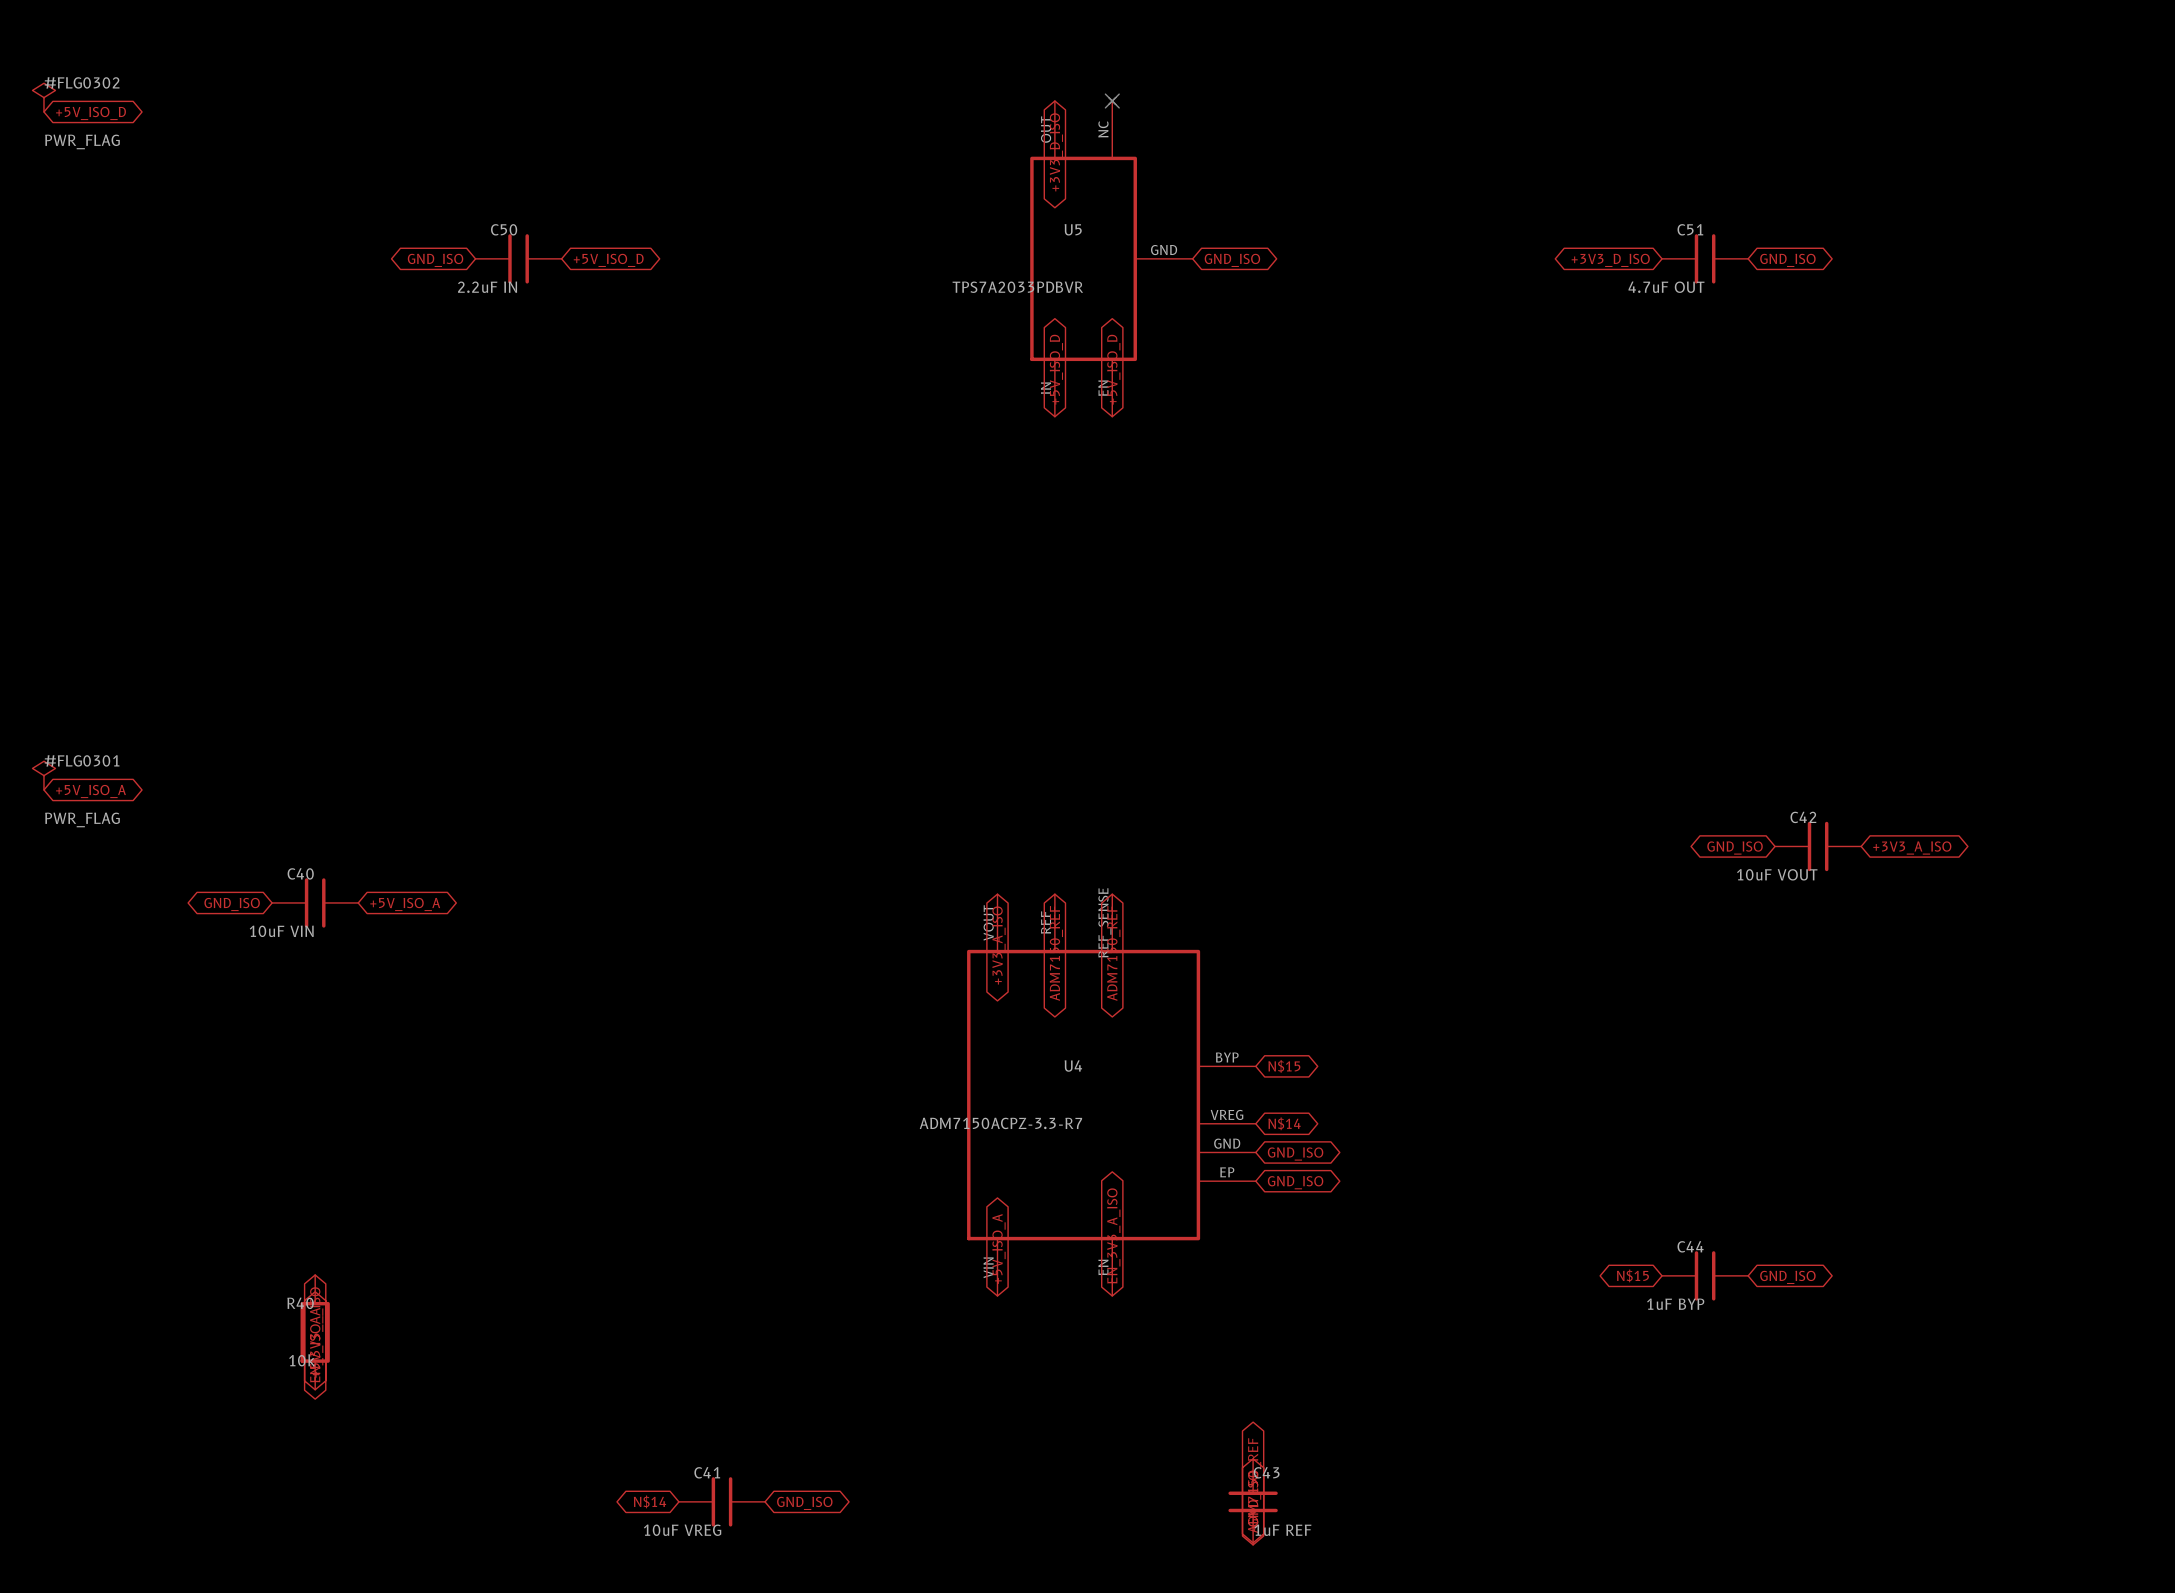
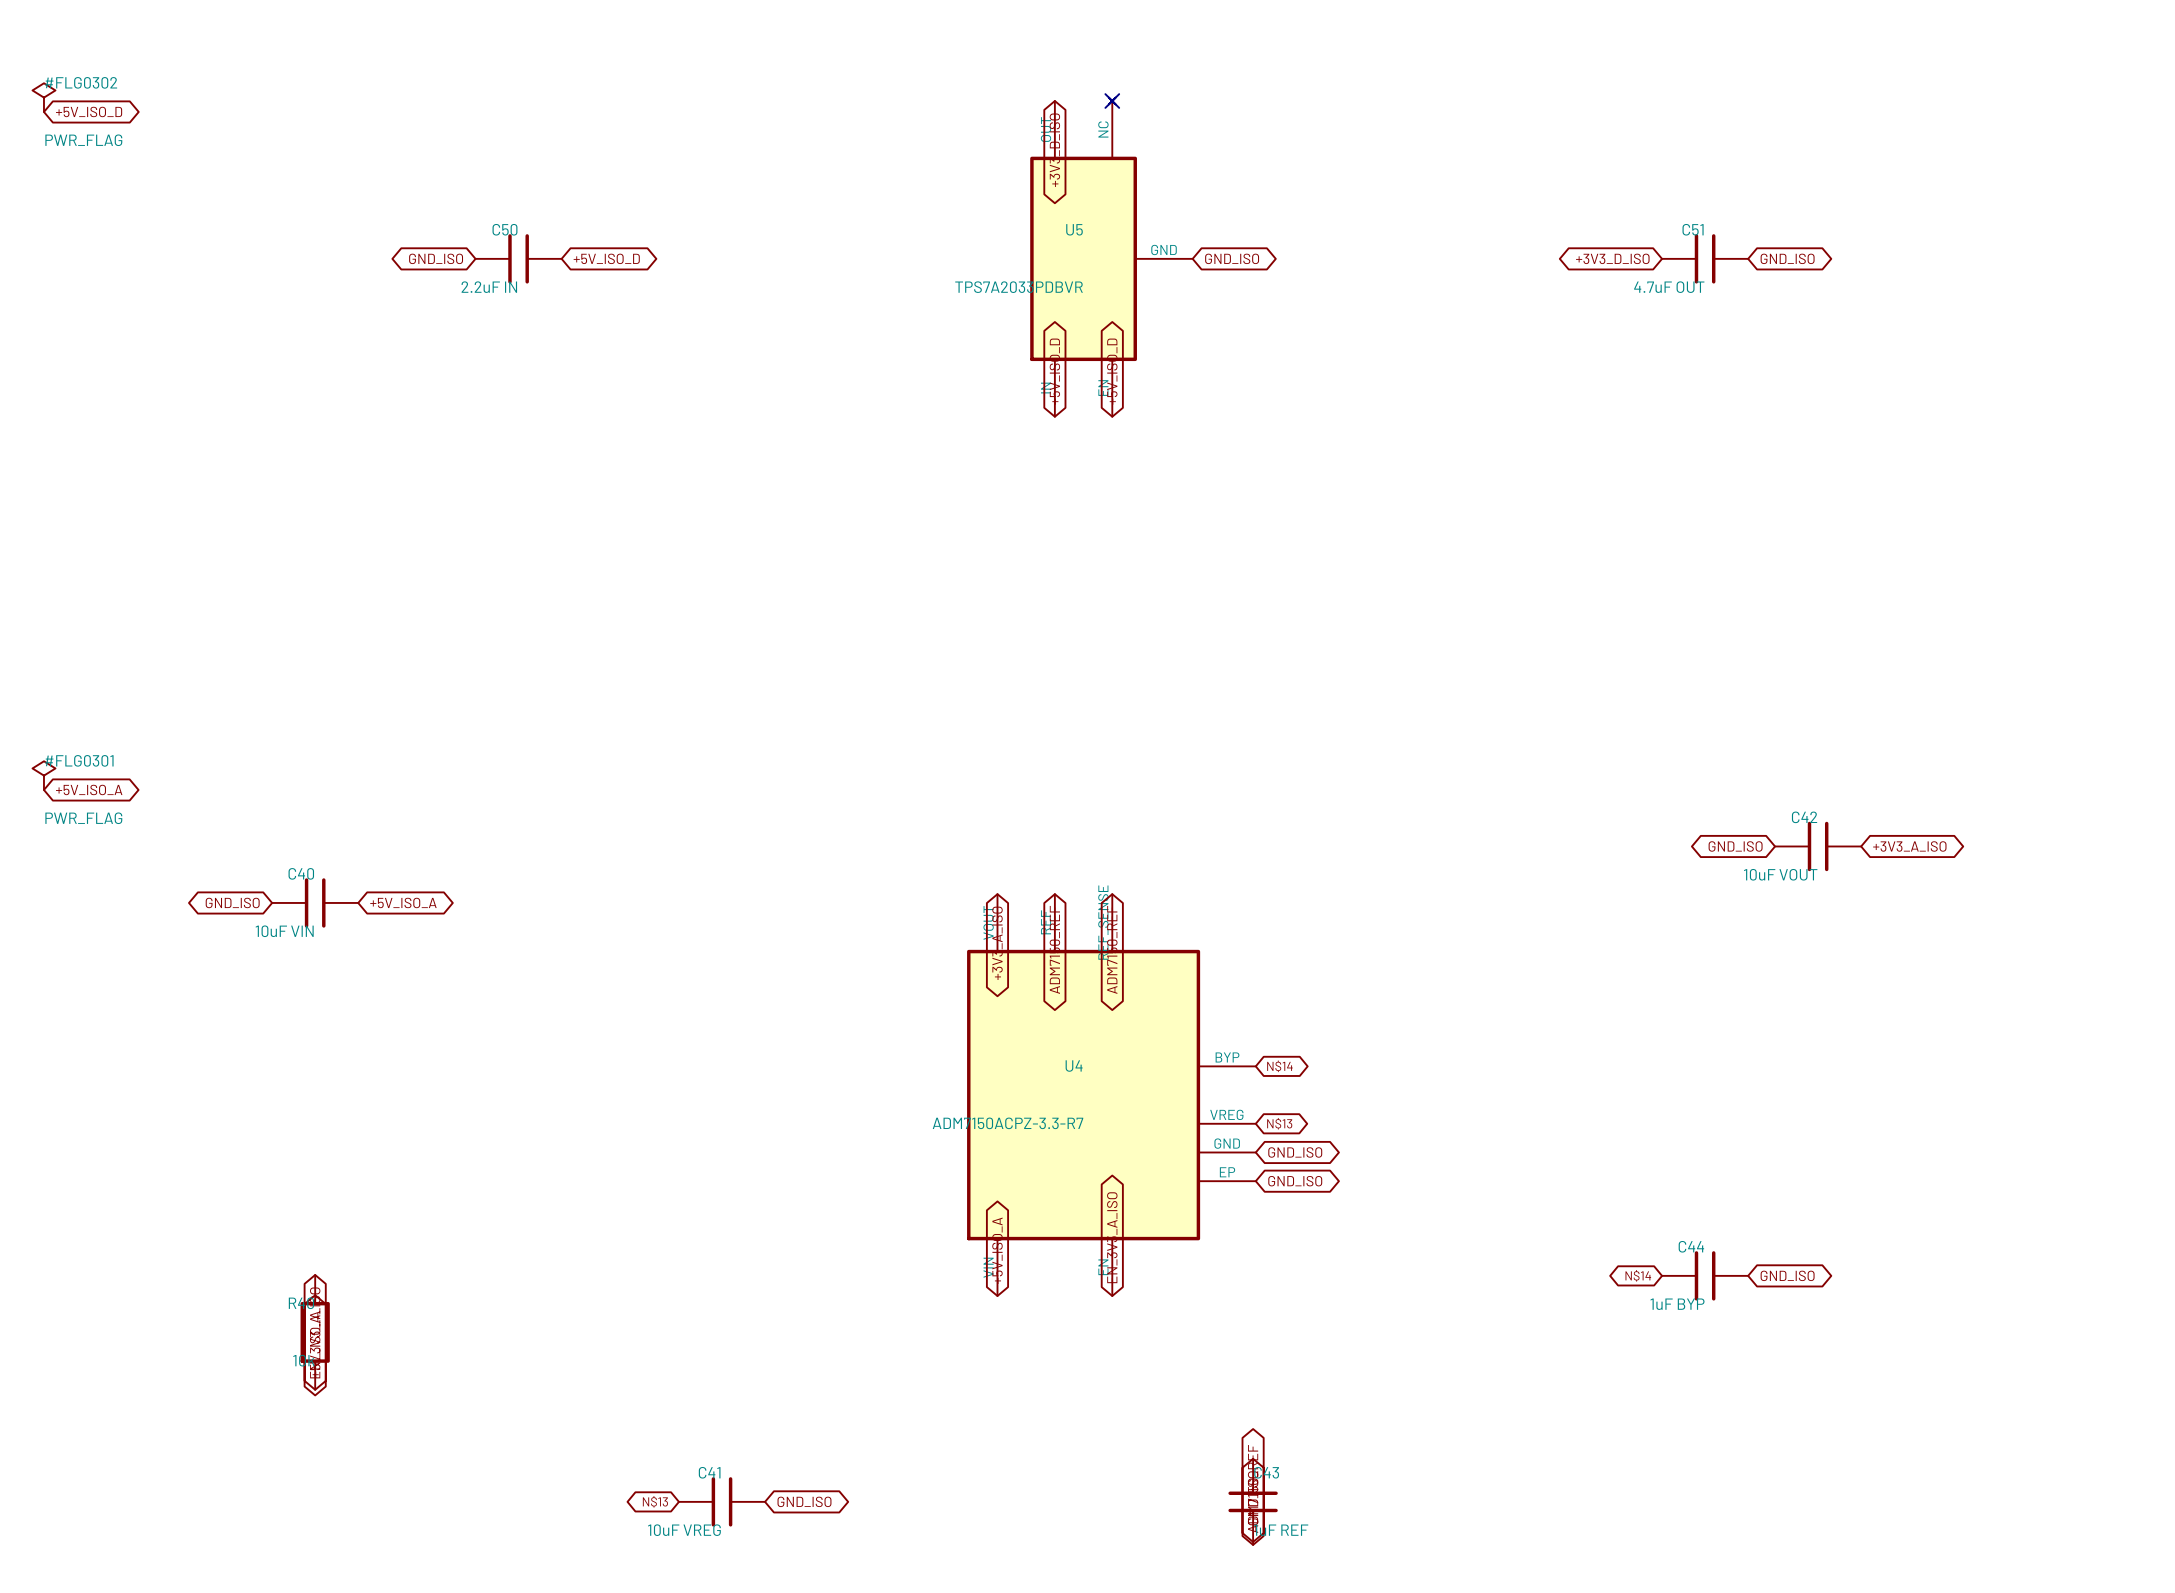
global label: N$15 (1284, 1066) -> N$14 (1279, 1066)
global label: N$14 (1284, 1123) -> N$13 (1279, 1123)
global label: N$15 (1632, 1275) -> N$14 (1638, 1275)
global label: N$14 (650, 1501) -> N$13 (655, 1501)

